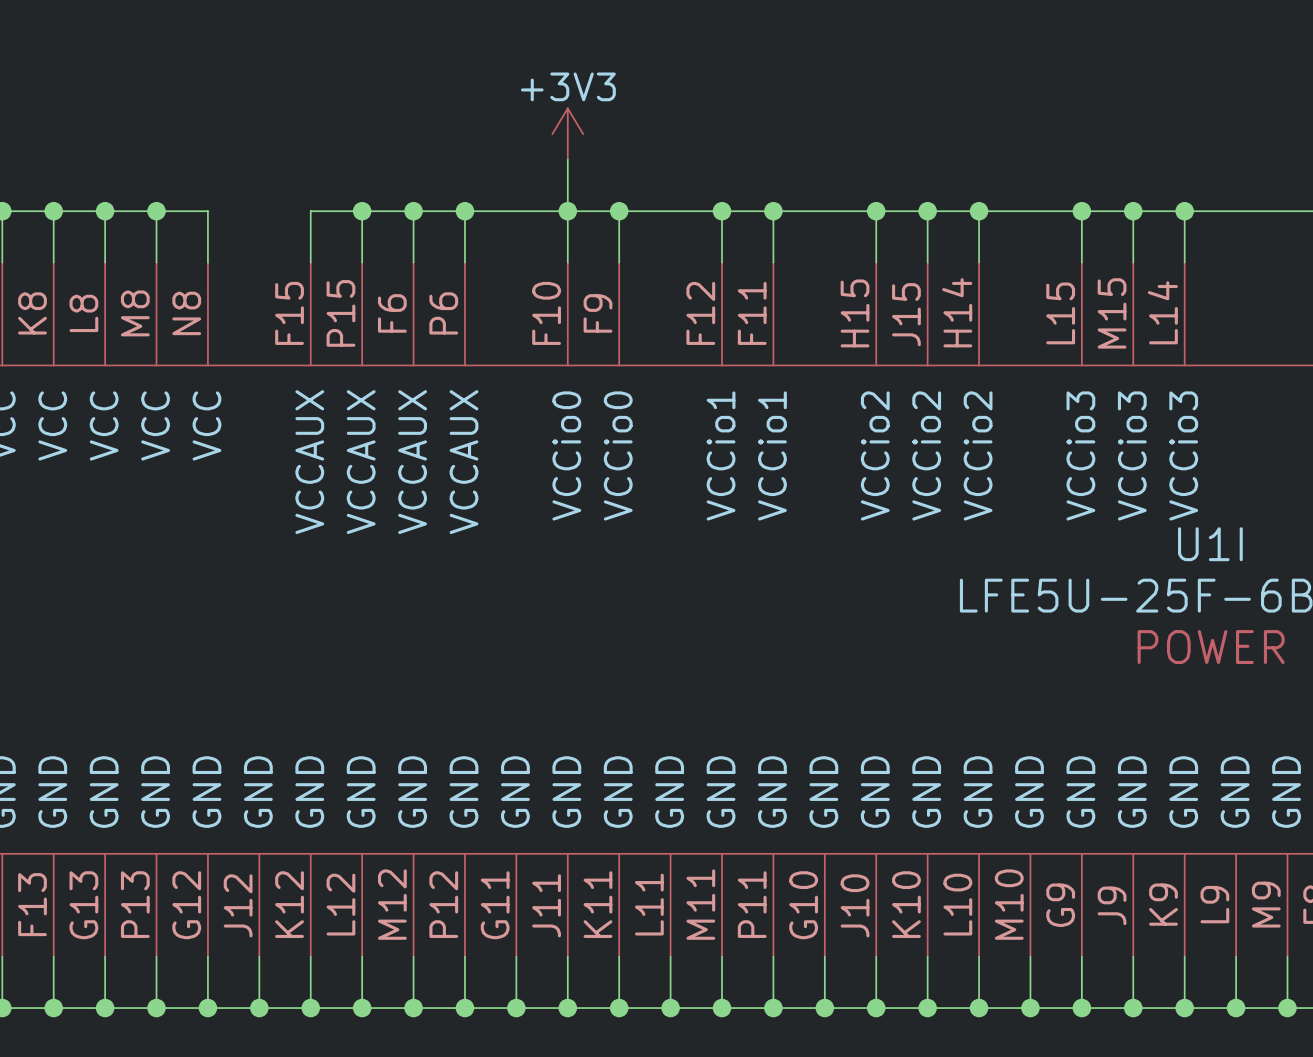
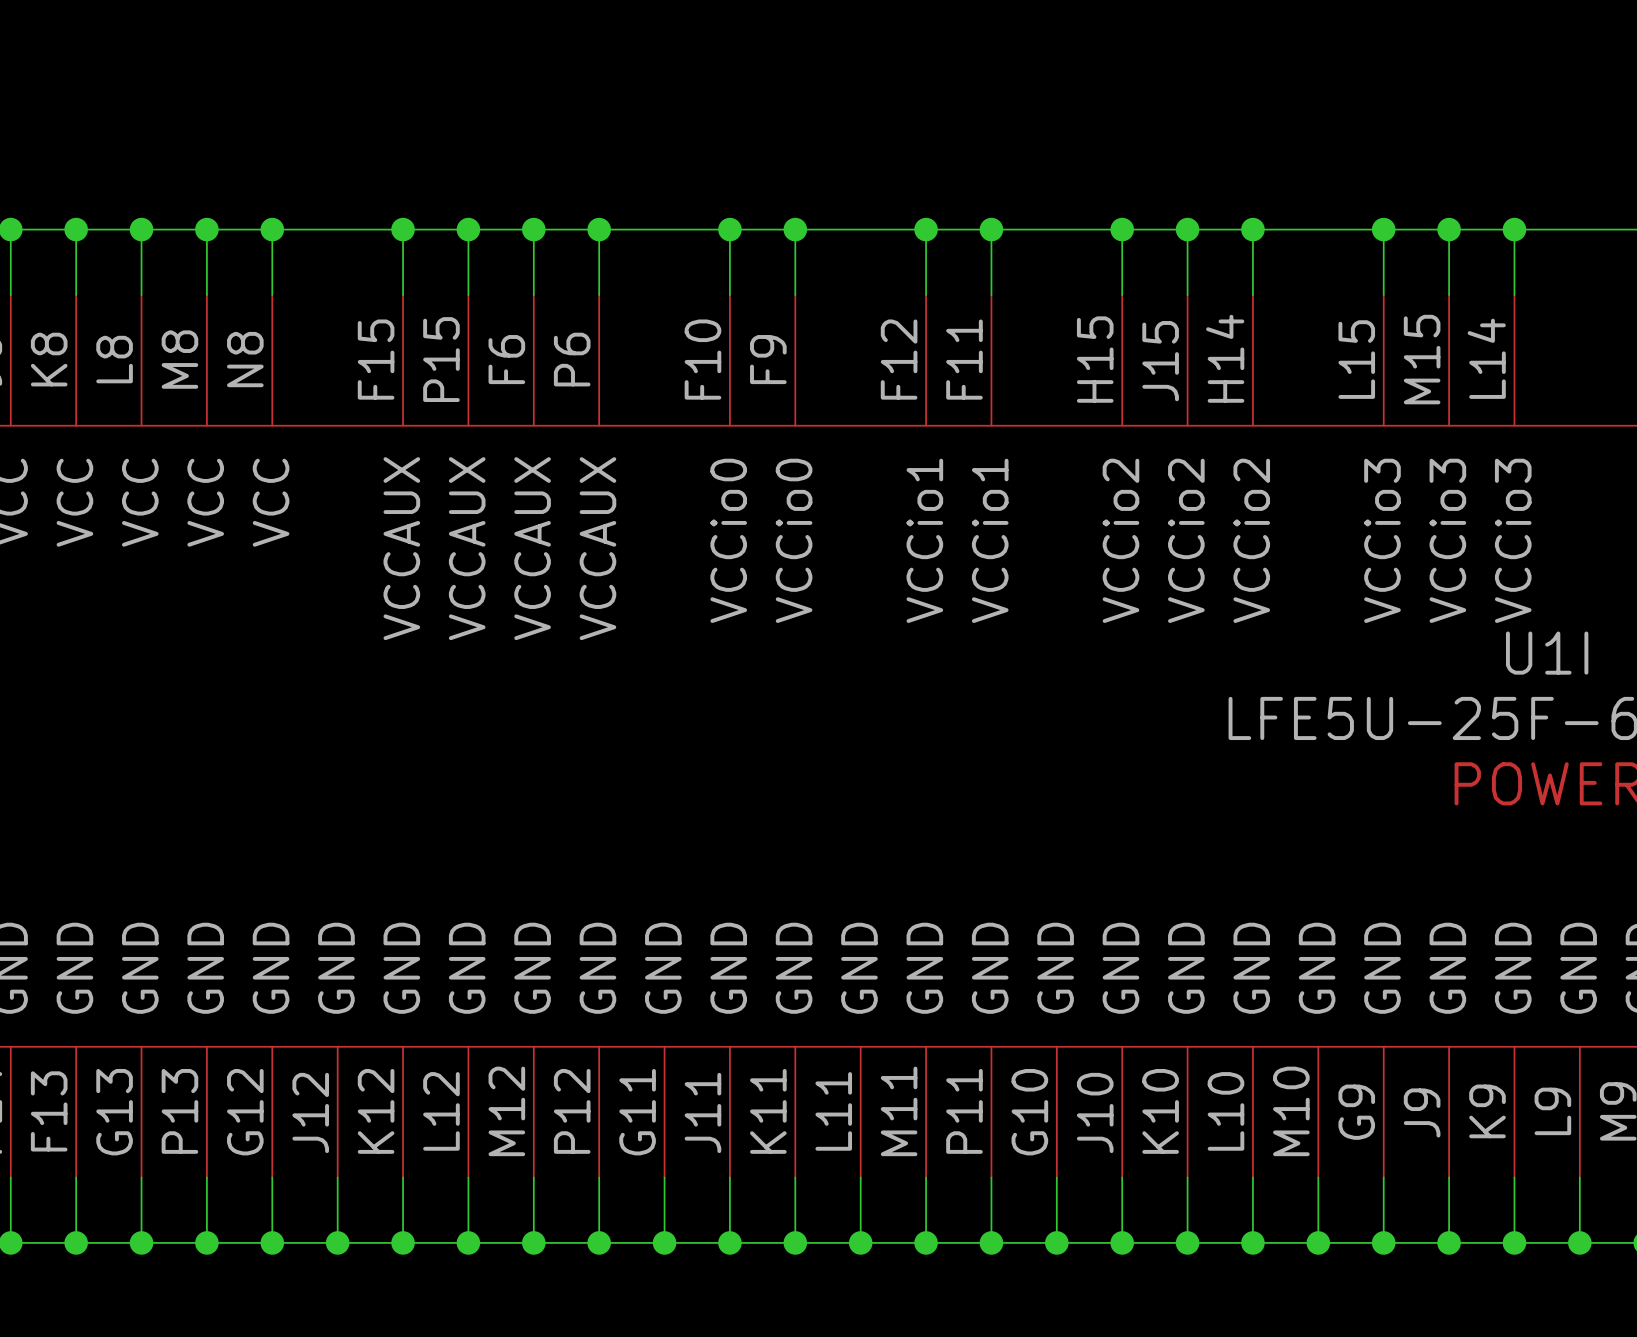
power symbol: +3V3 (567, 134) -> none
wire: (567, 159) (567, 211) -> none
wire: none -> (272, 229) (403, 229)
junction: none -> (272, 229)
junction: none -> (403, 229)

